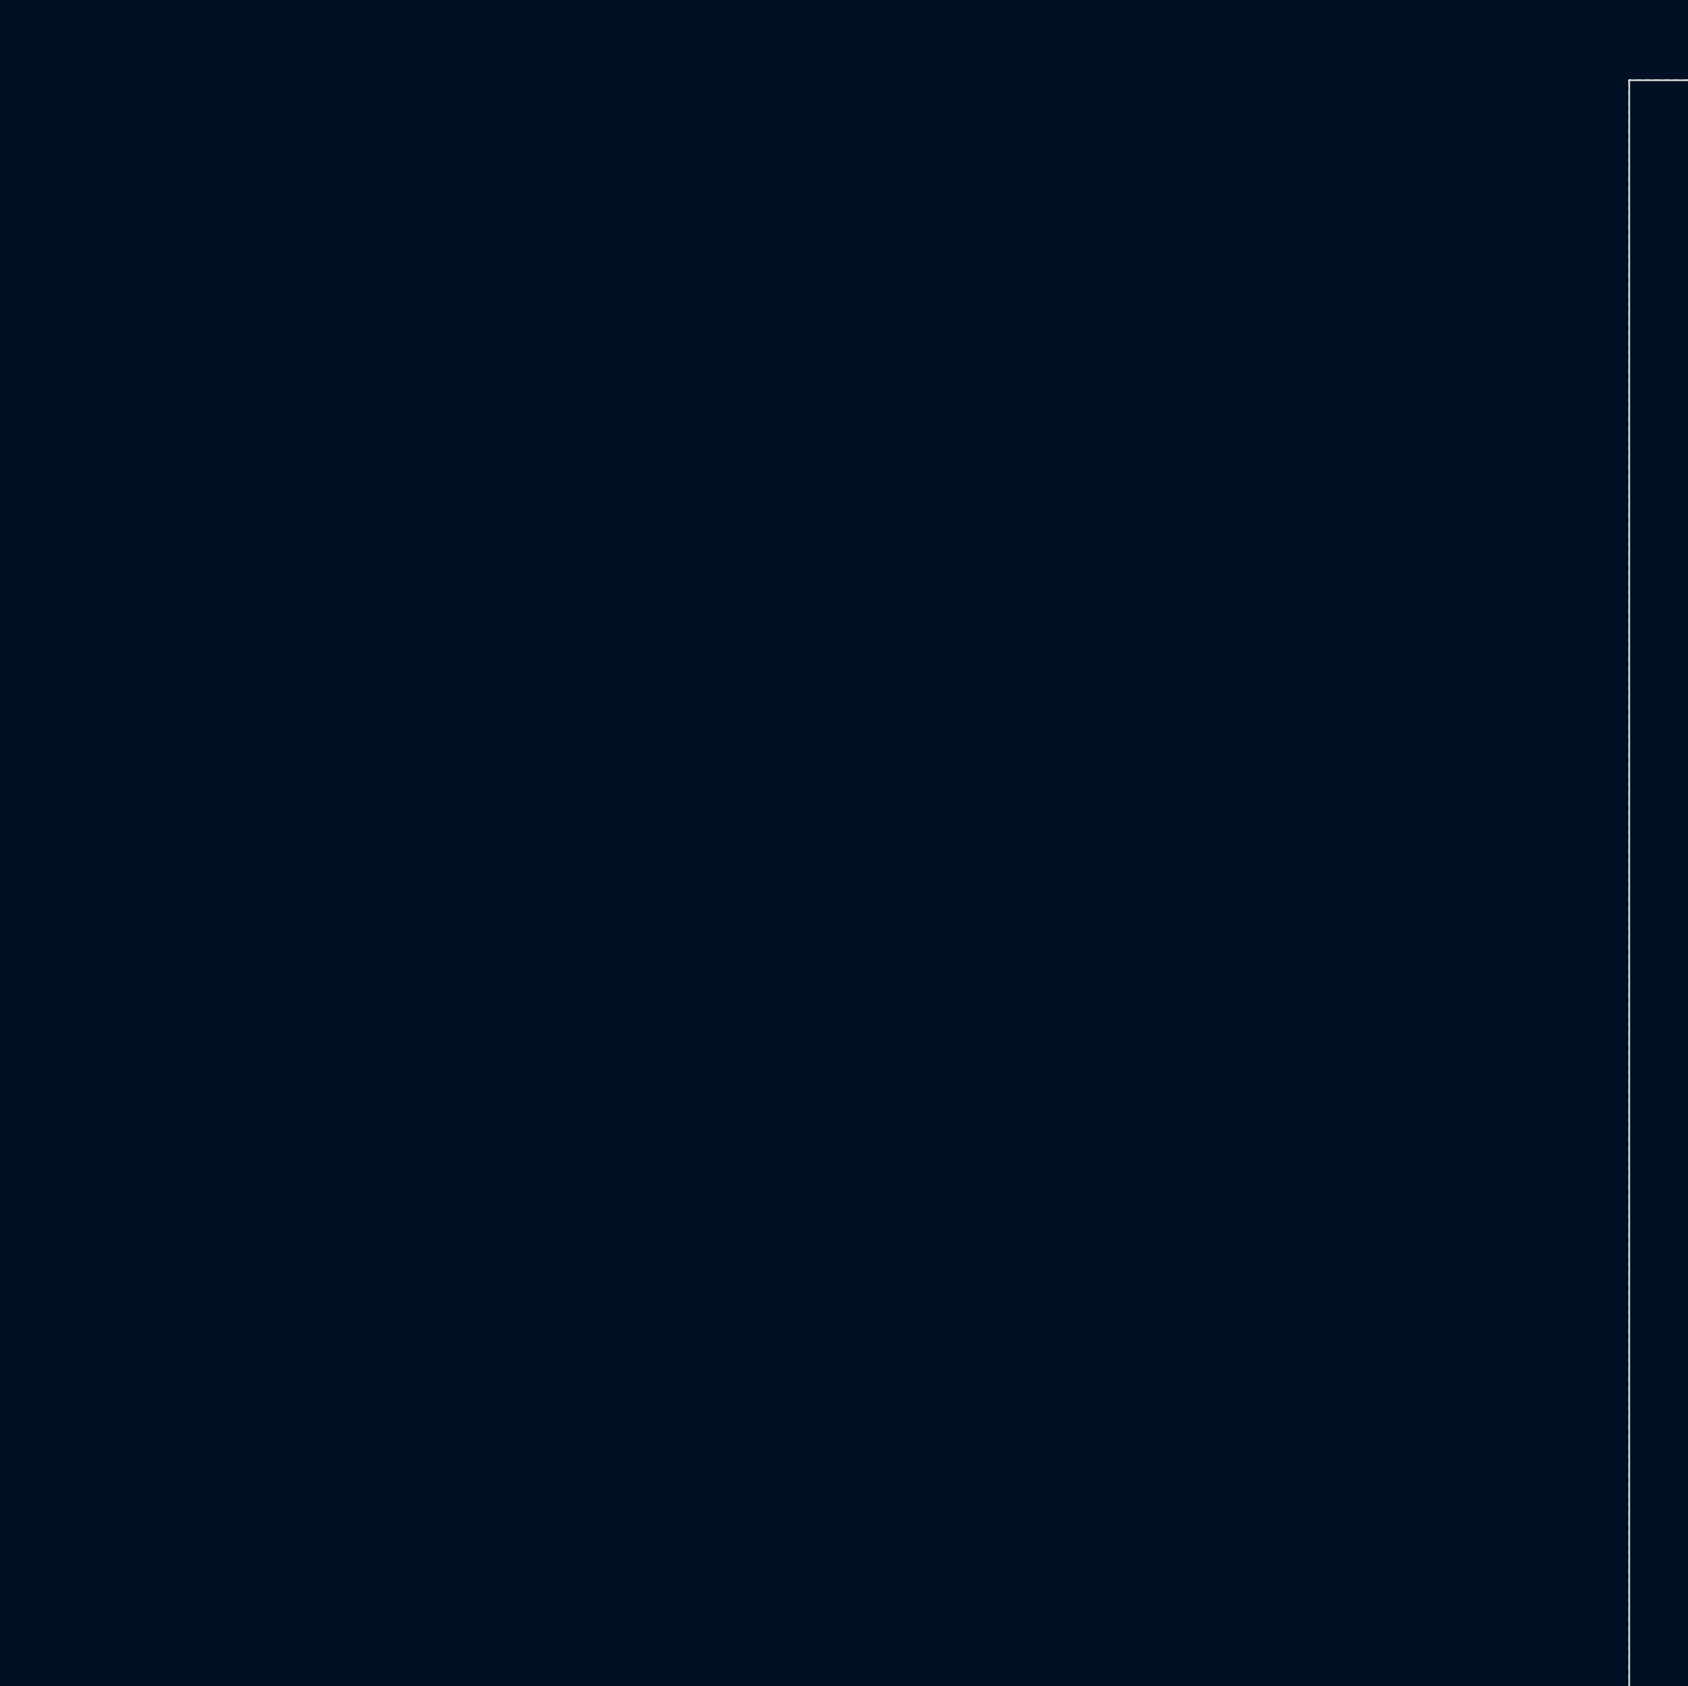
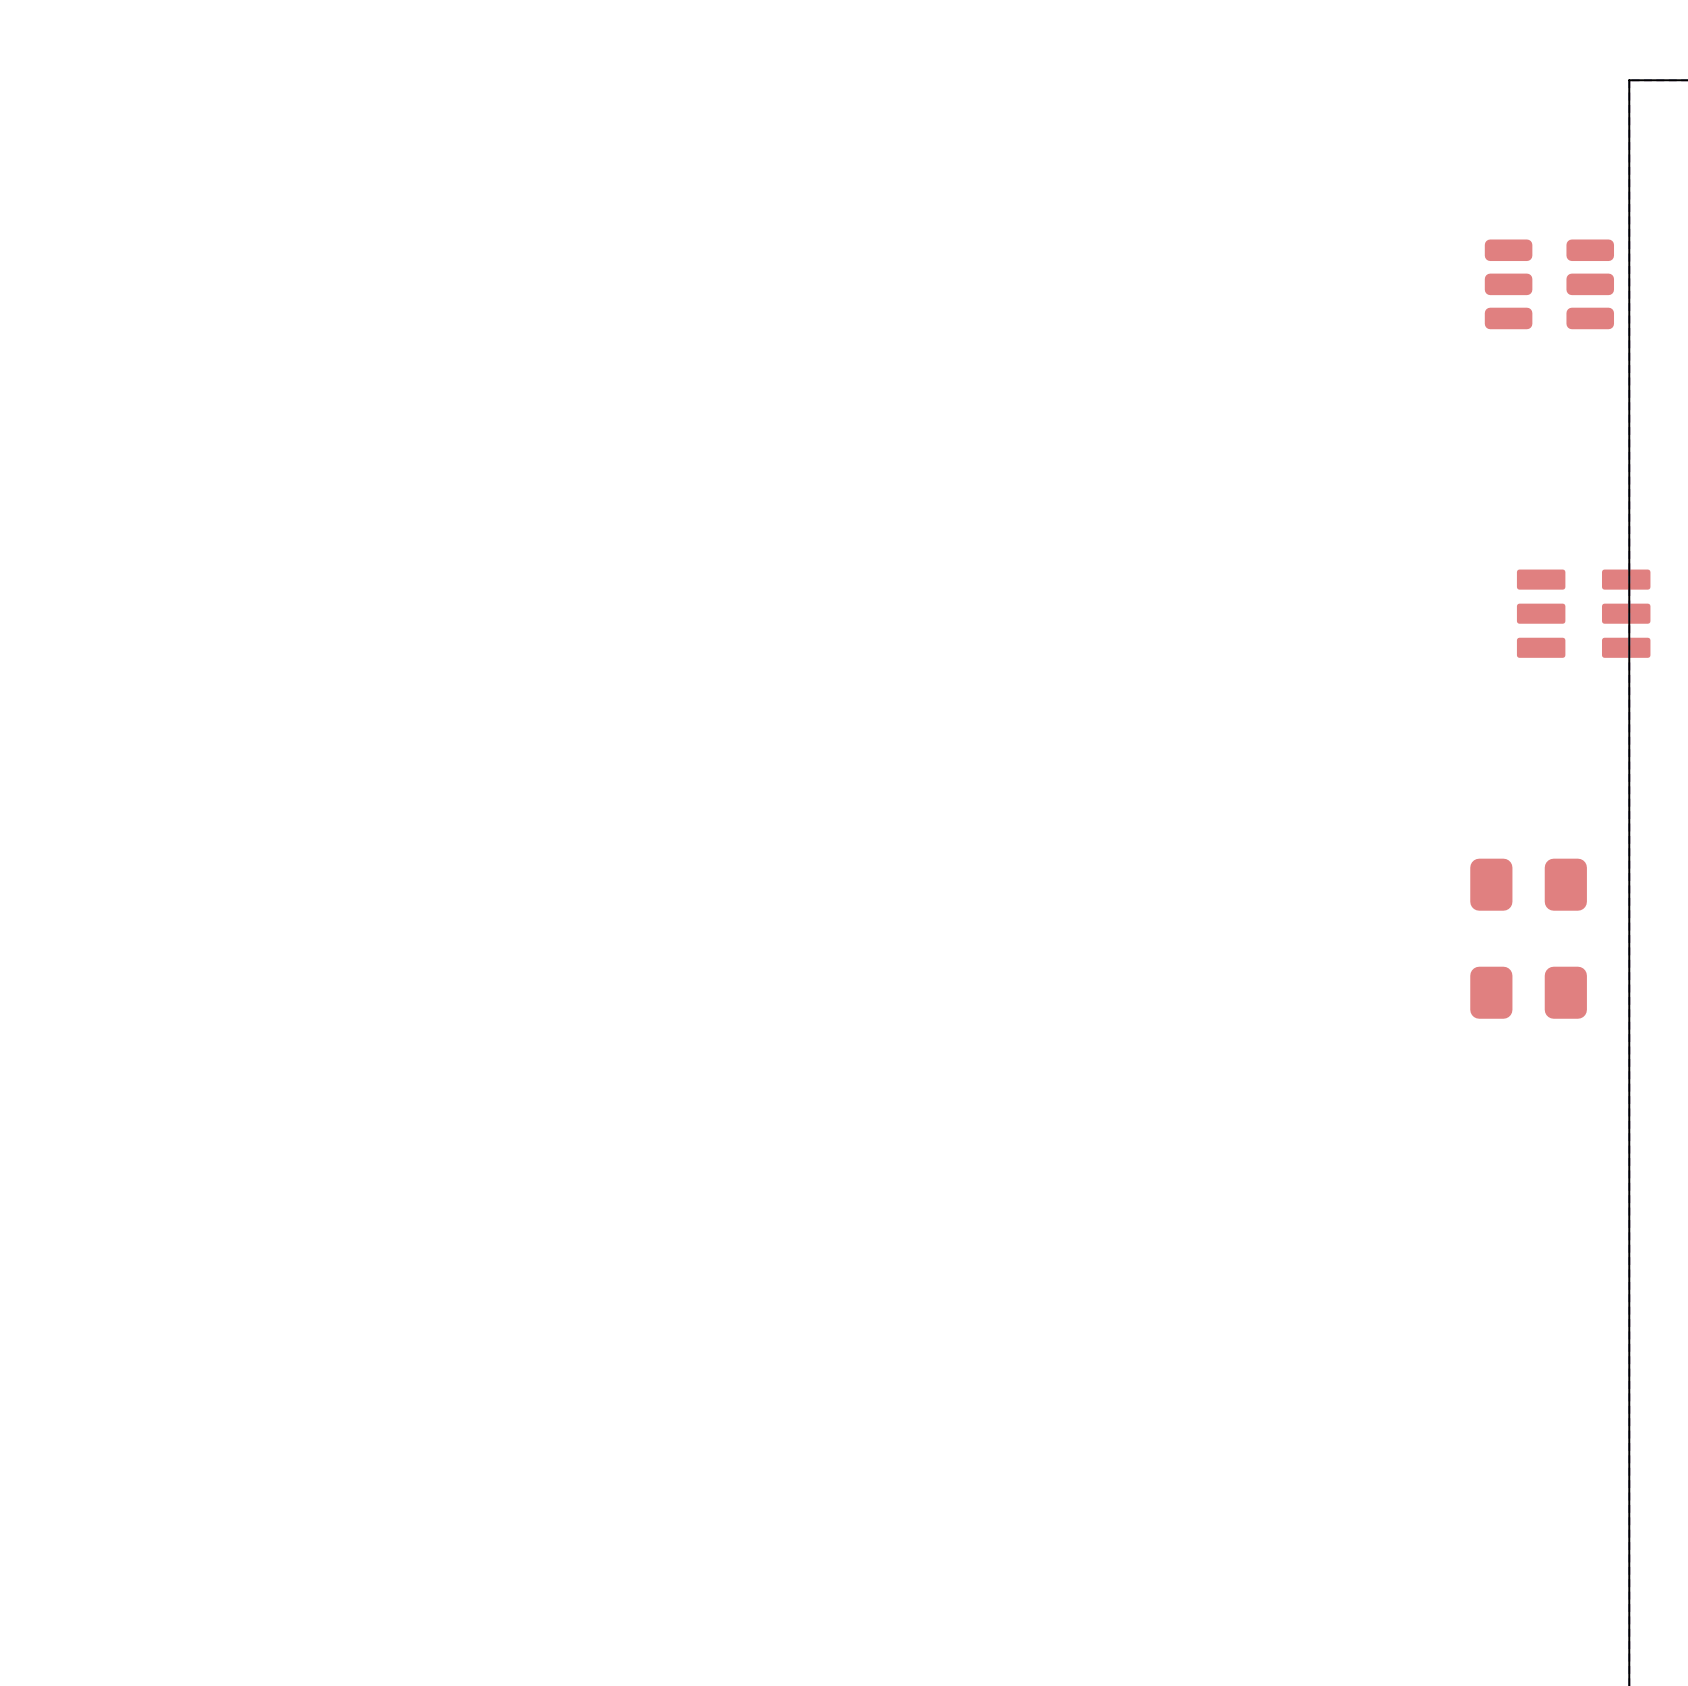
part: none -> (1549, 284)
part: none -> (1583, 613)
part: none -> (1528, 884)
part: none -> (1528, 992)

